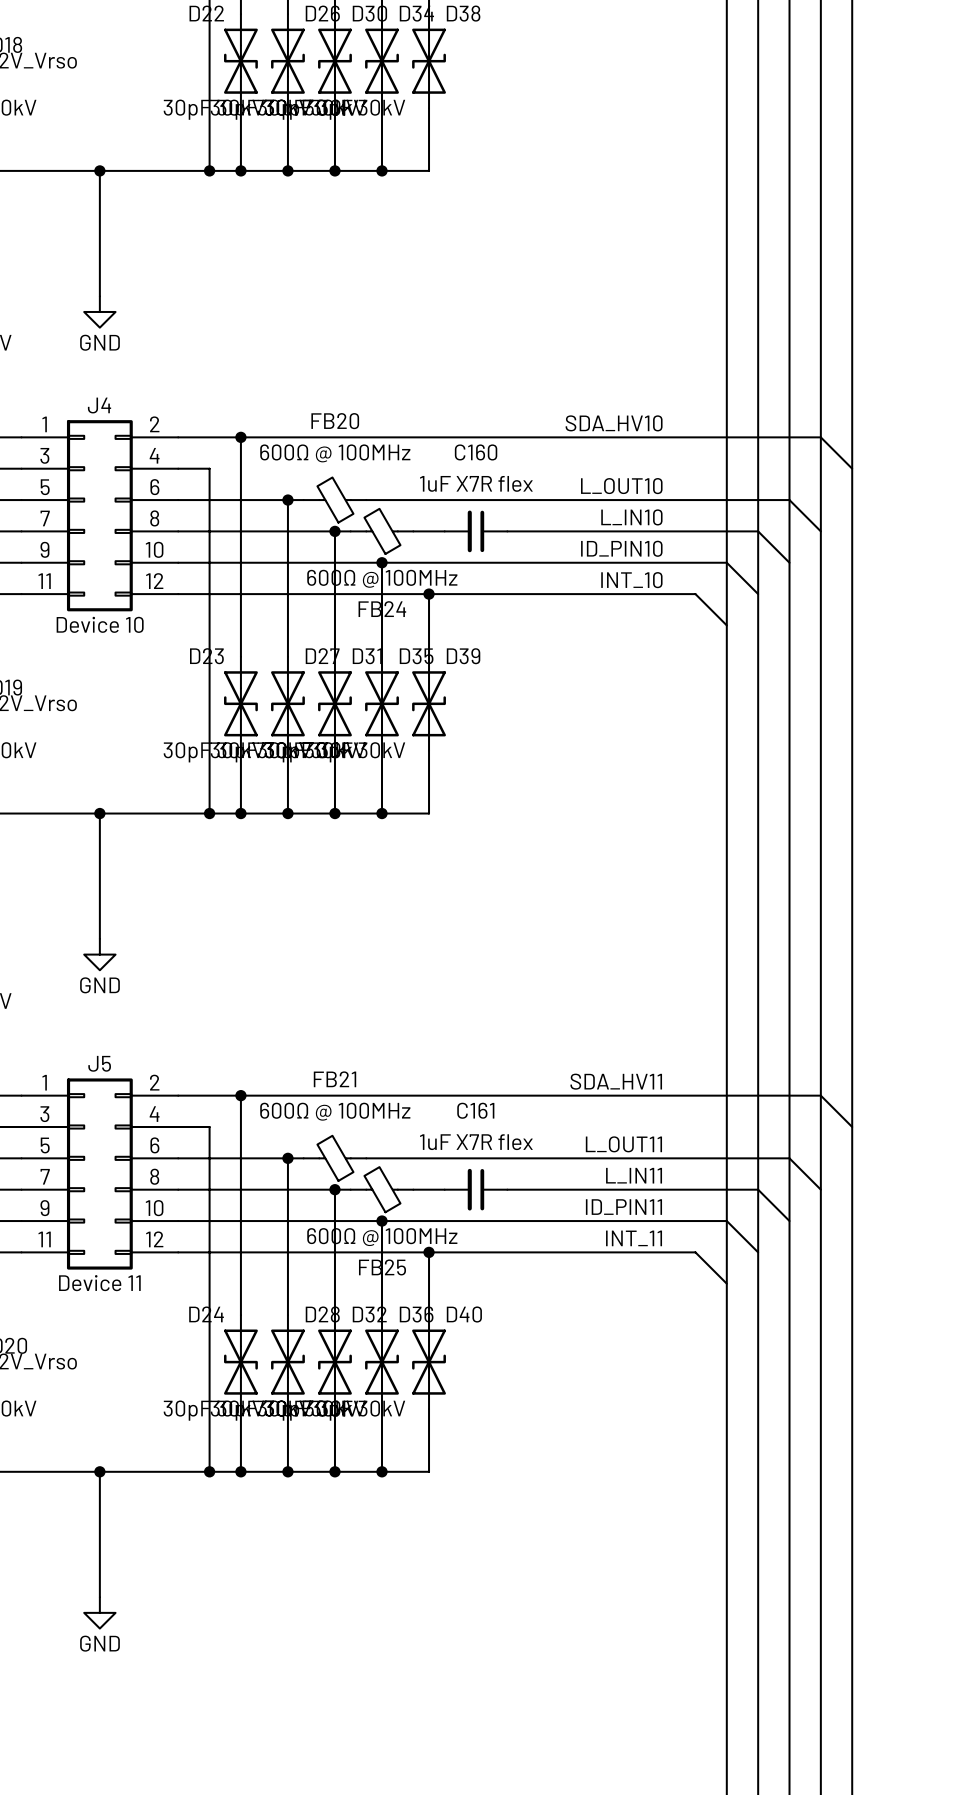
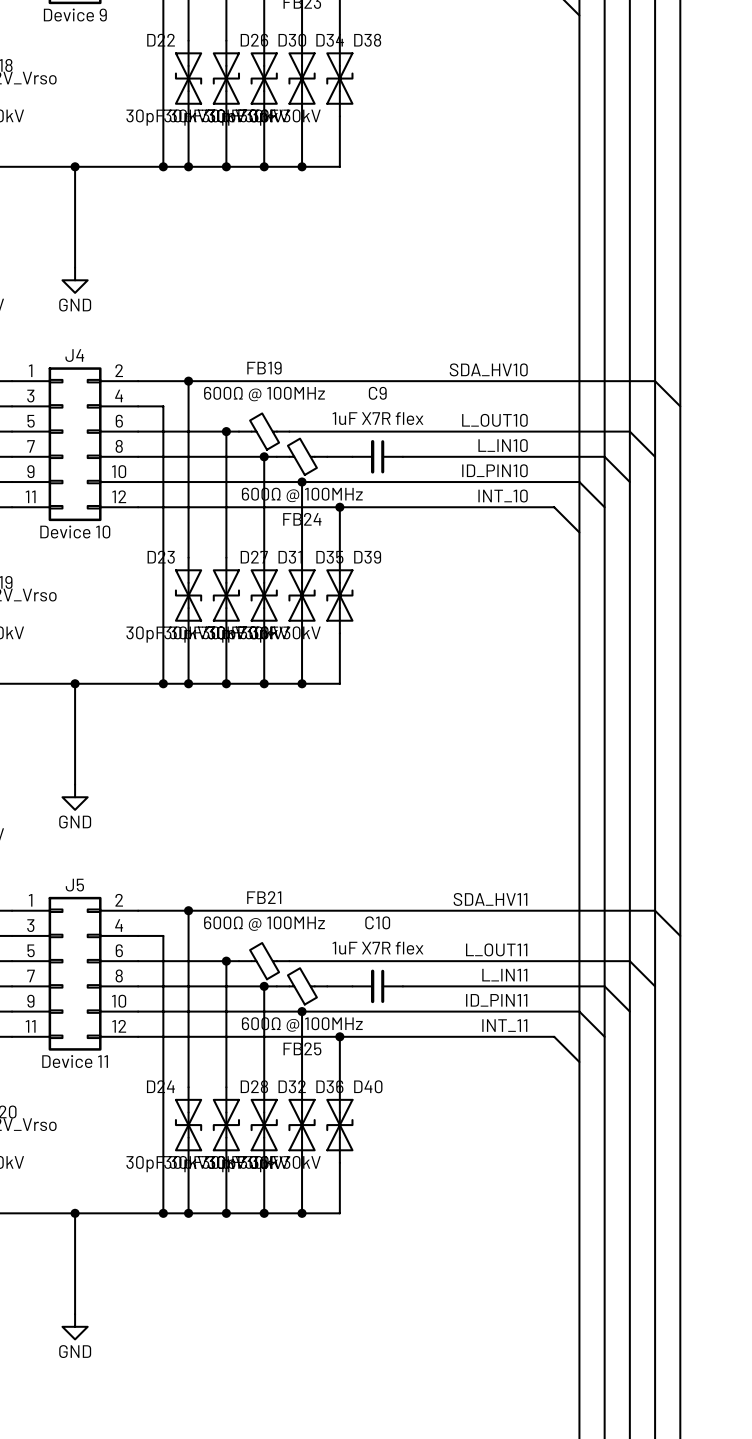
FB20 name: FB20 (335, 421) -> FB19 (264, 368)
C160 name: C160 (476, 452) -> C9 (377, 393)
C161 name: C161 (475, 1110) -> C10 (377, 922)

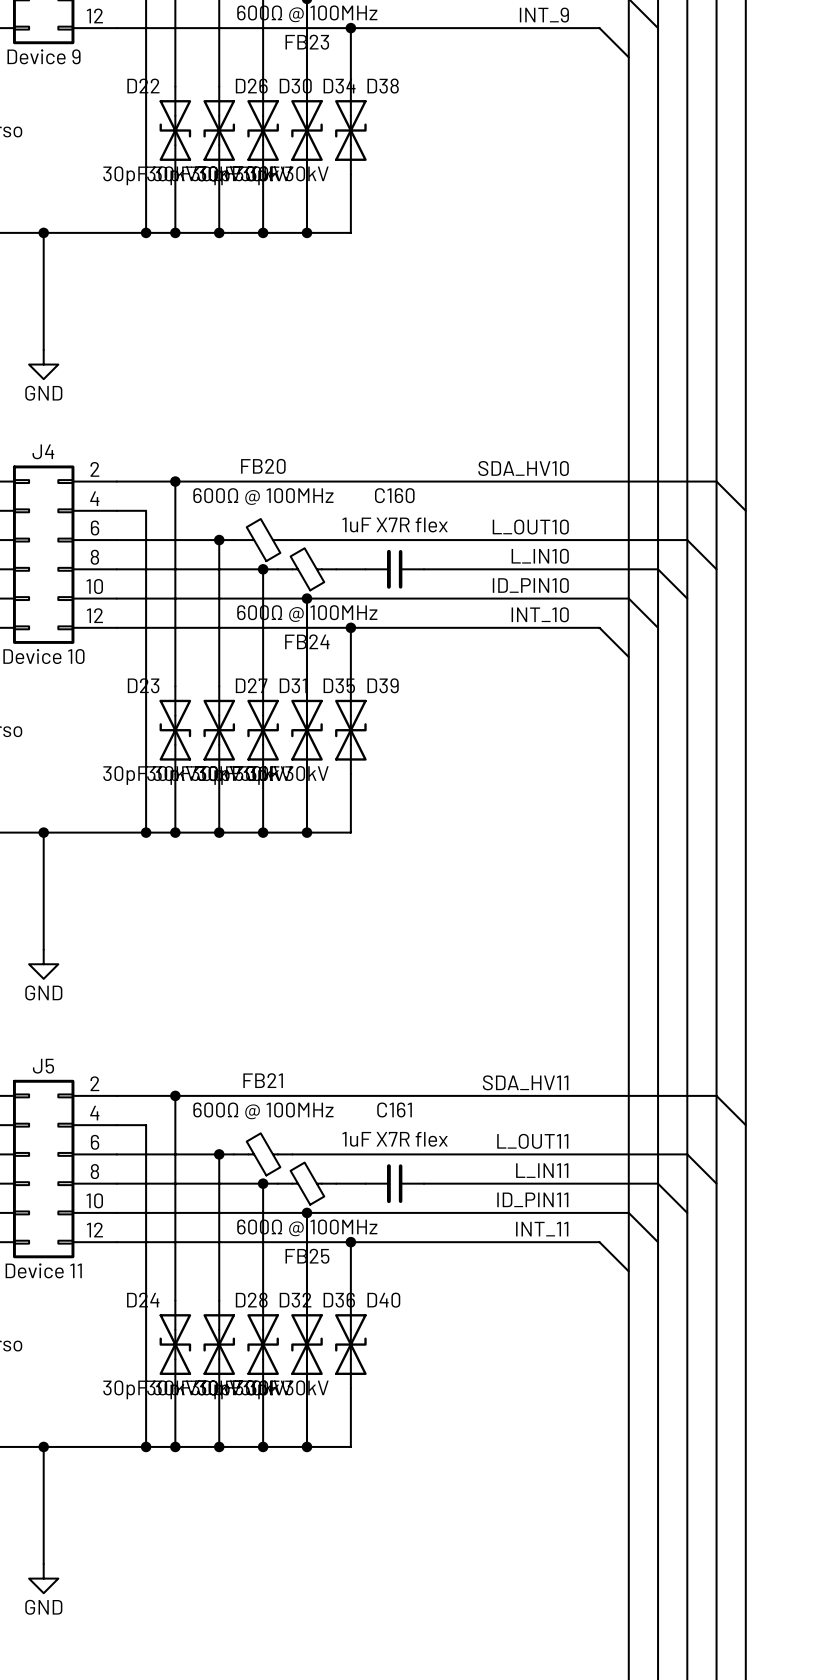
FB19 name: FB19 (264, 368) -> FB20 (263, 466)
C9 name: C9 (377, 393) -> C160 (394, 495)
C10 name: C10 (377, 922) -> C161 (394, 1109)

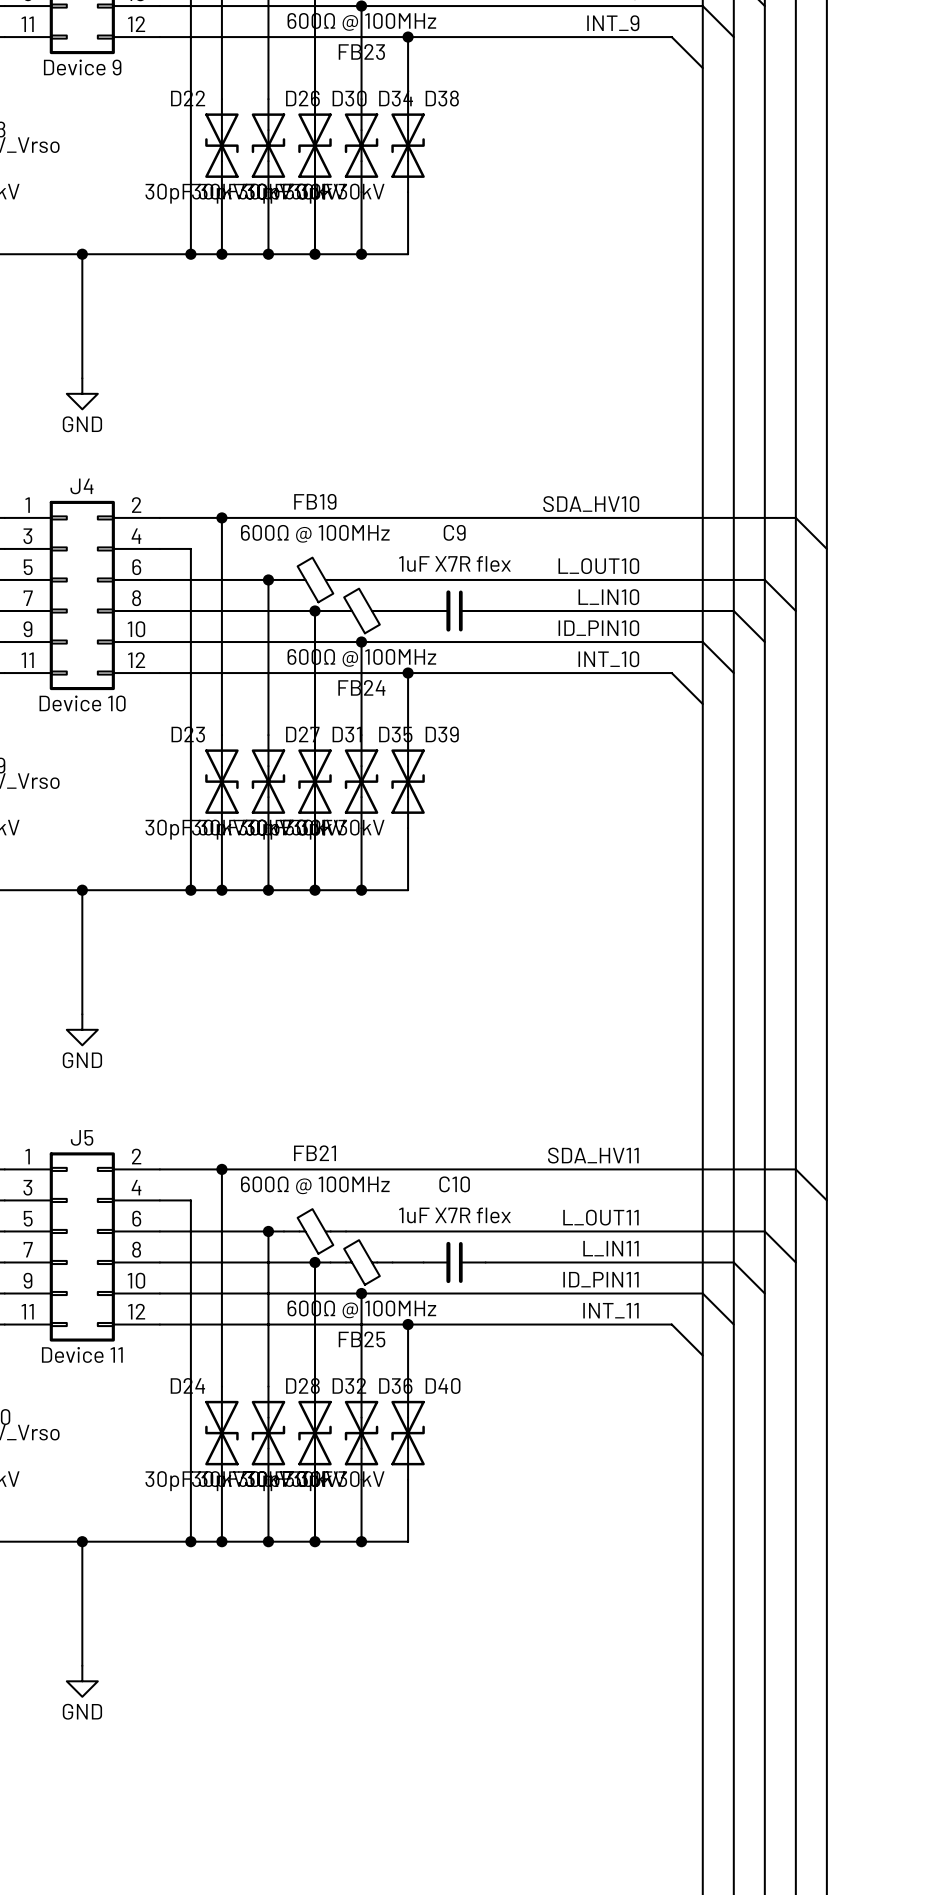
FB20 name: FB20 (263, 466) -> FB19 (315, 501)
C160 name: C160 (394, 495) -> C9 (454, 532)
C161 name: C161 (394, 1109) -> C10 (454, 1184)

